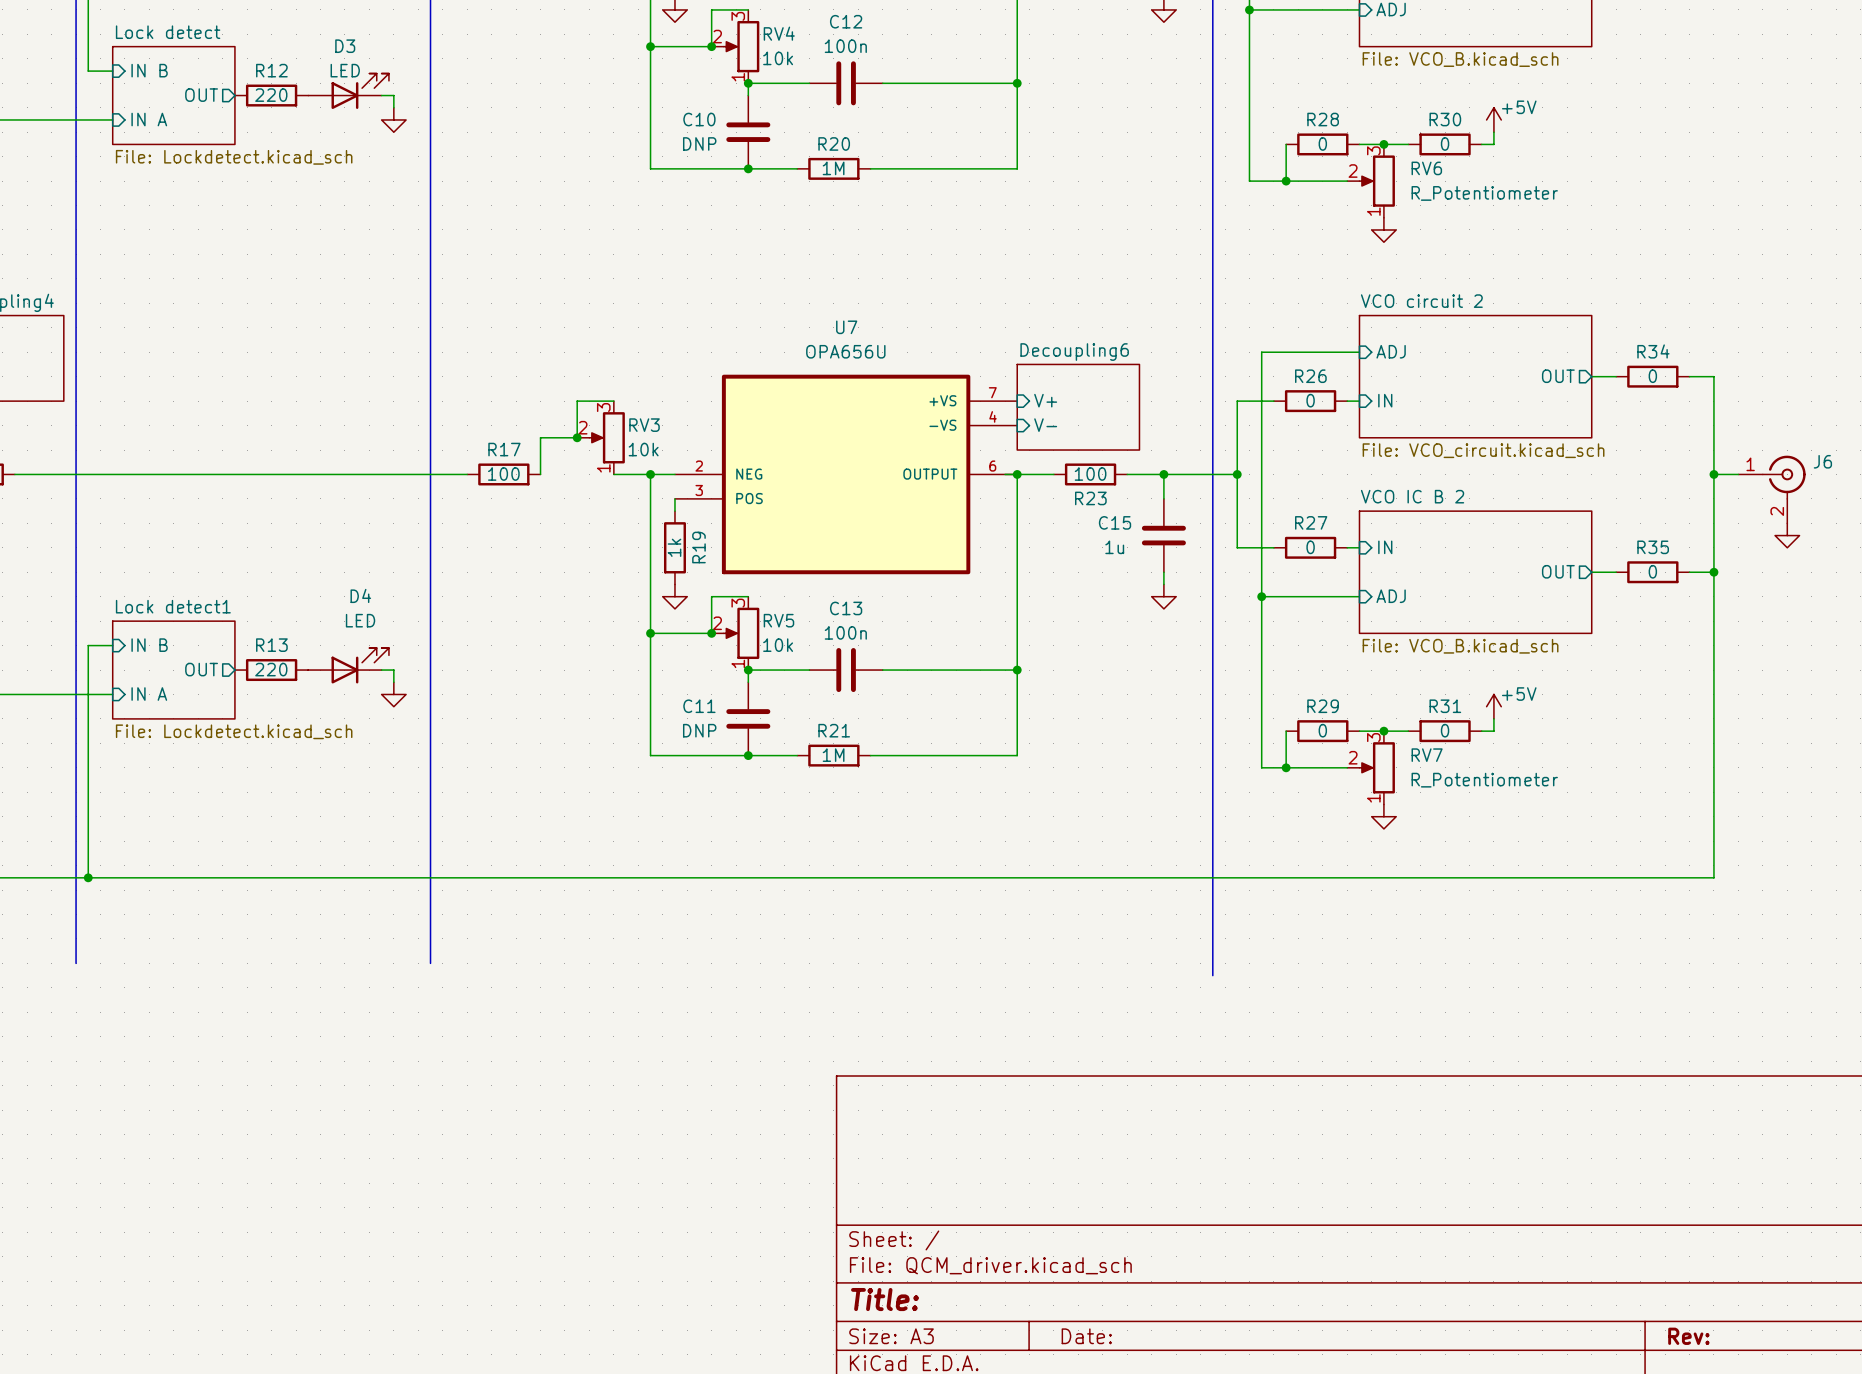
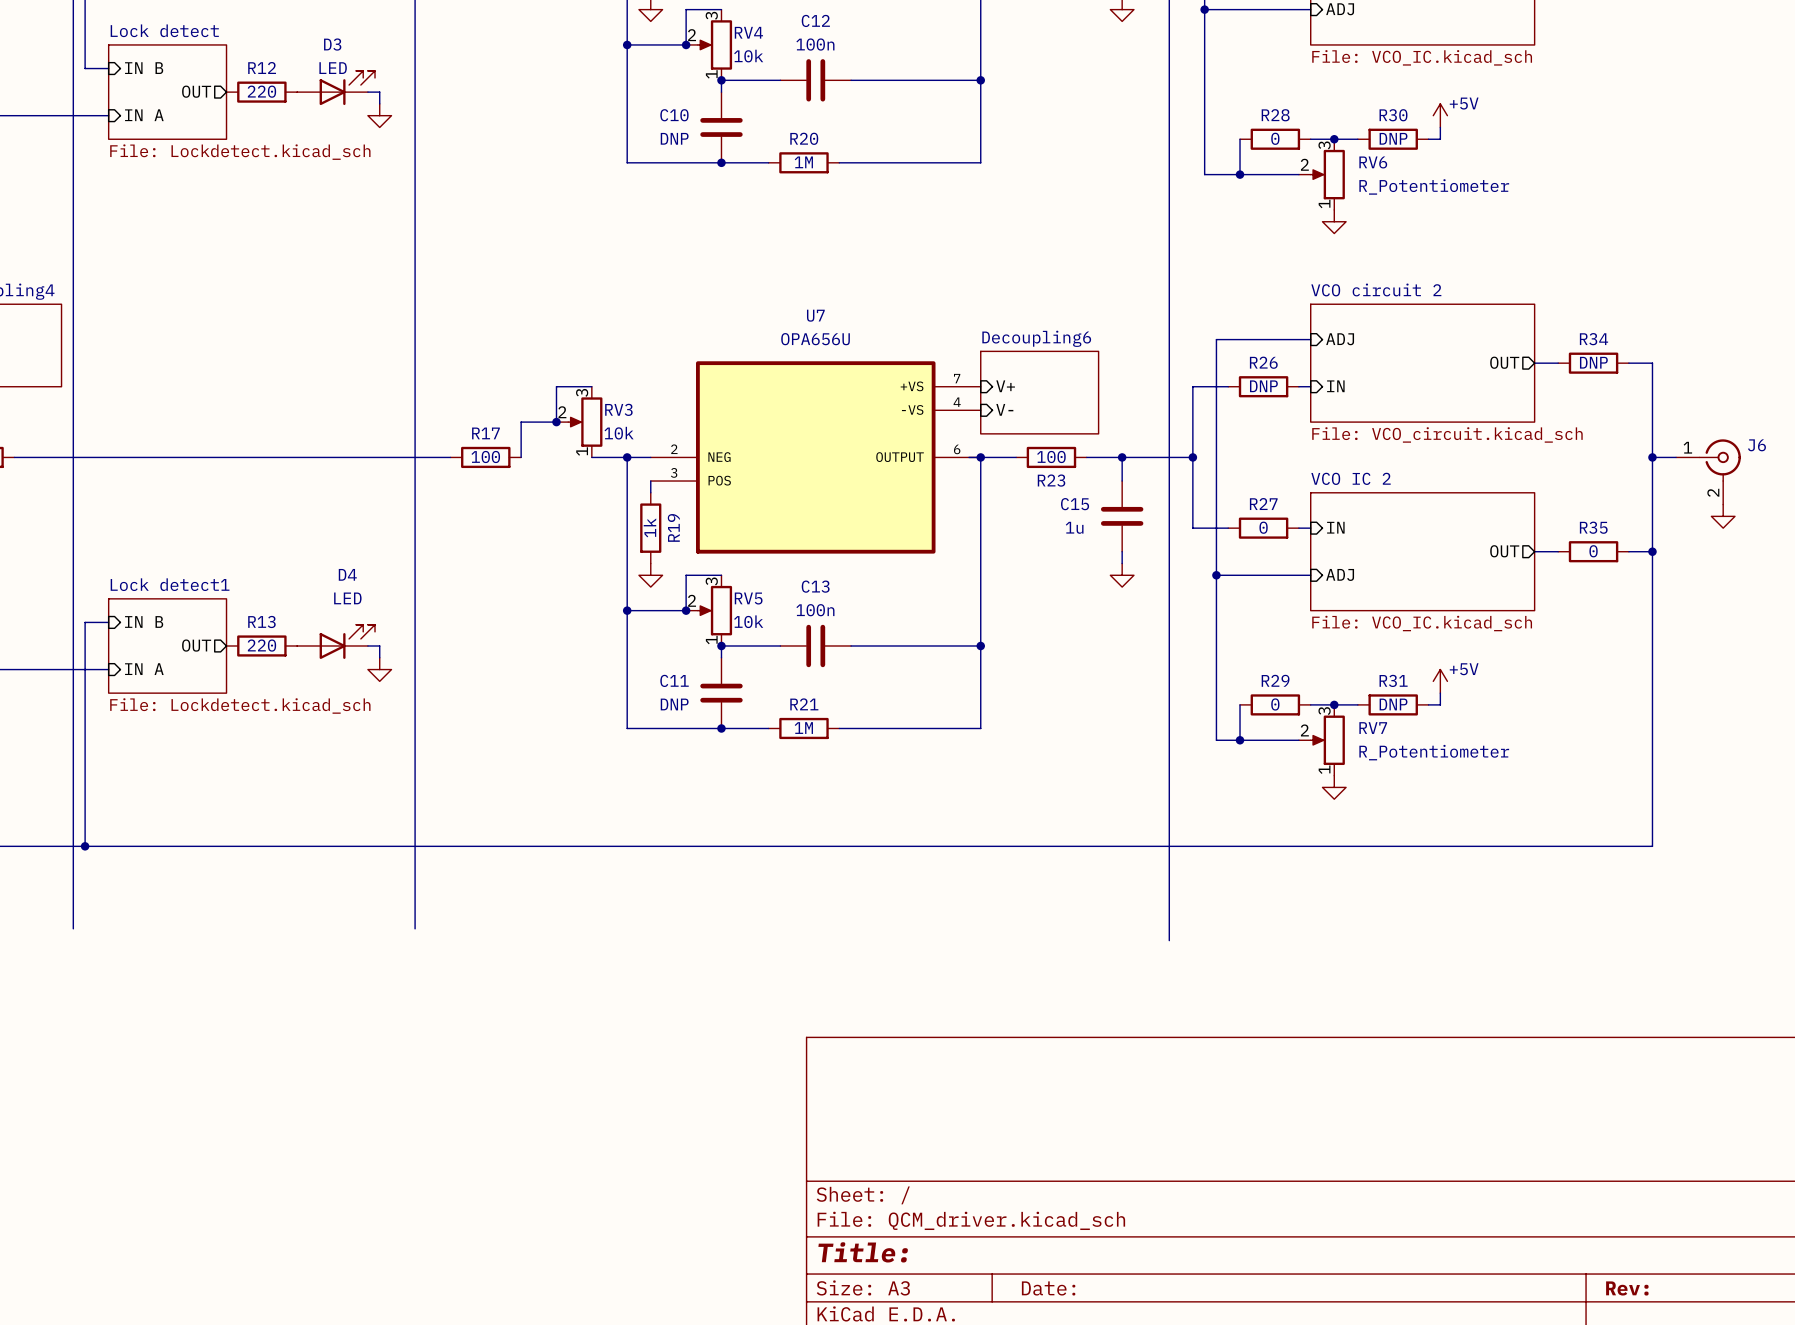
sheet value: File: VCO_B.kicad_sch (1460, 59) -> File: VCO_IC.kicad_sch (1422, 57)
R30 value: 0 (1445, 143) -> DNP (1393, 138)
R34 value: 0 (1652, 376) -> DNP (1593, 362)
R26 value: 0 (1310, 400) -> DNP (1263, 386)
sheet VCO IC B 2 name: VCO IC B 2 (1412, 496) -> VCO IC 2 (1351, 478)
sheet VCO IC B 2 value: File: VCO_B.kicad_sch (1460, 646) -> File: VCO_IC.kicad_sch (1422, 623)
R31 value: 0 (1445, 730) -> DNP (1393, 704)

